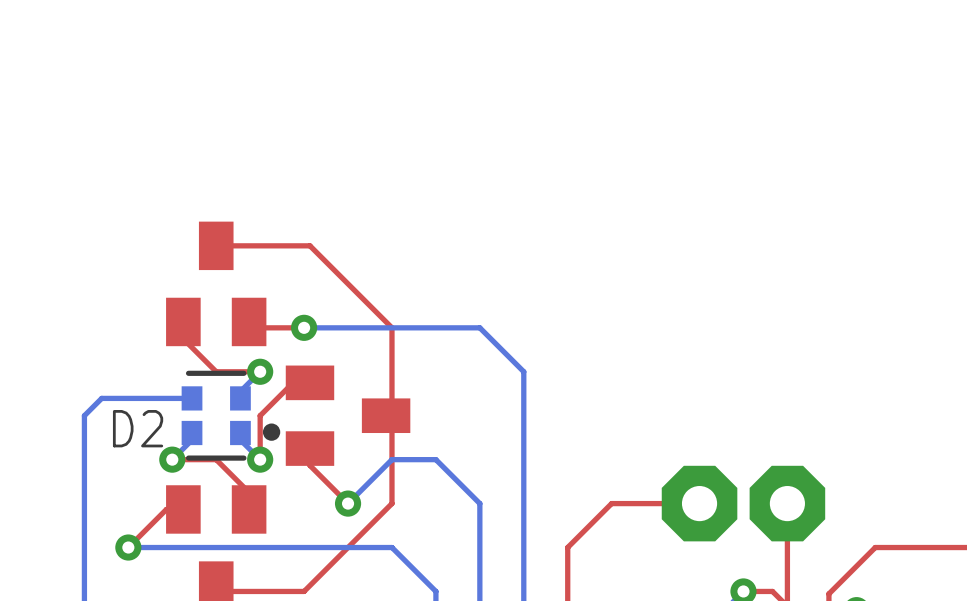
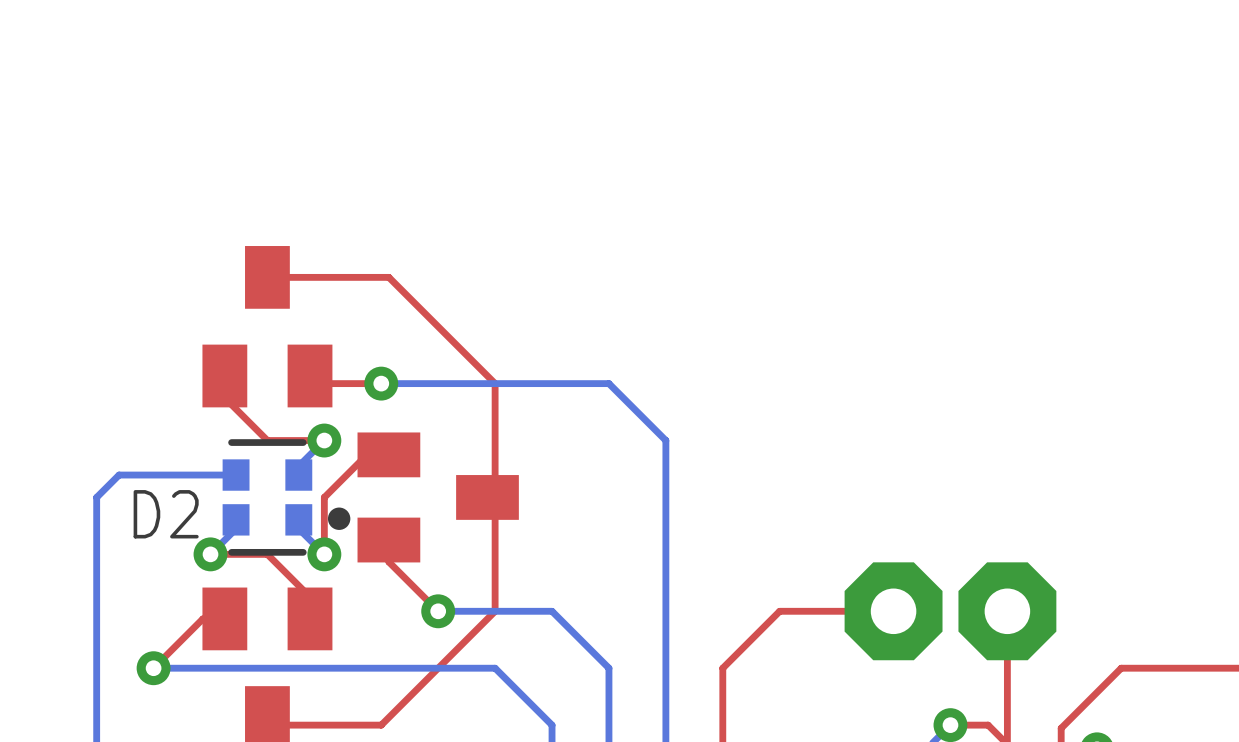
bottom track: (348, 503) (391, 459) (435, 459) (479, 503) (479, 547) -> (438, 611) (552, 611) (608, 668)

